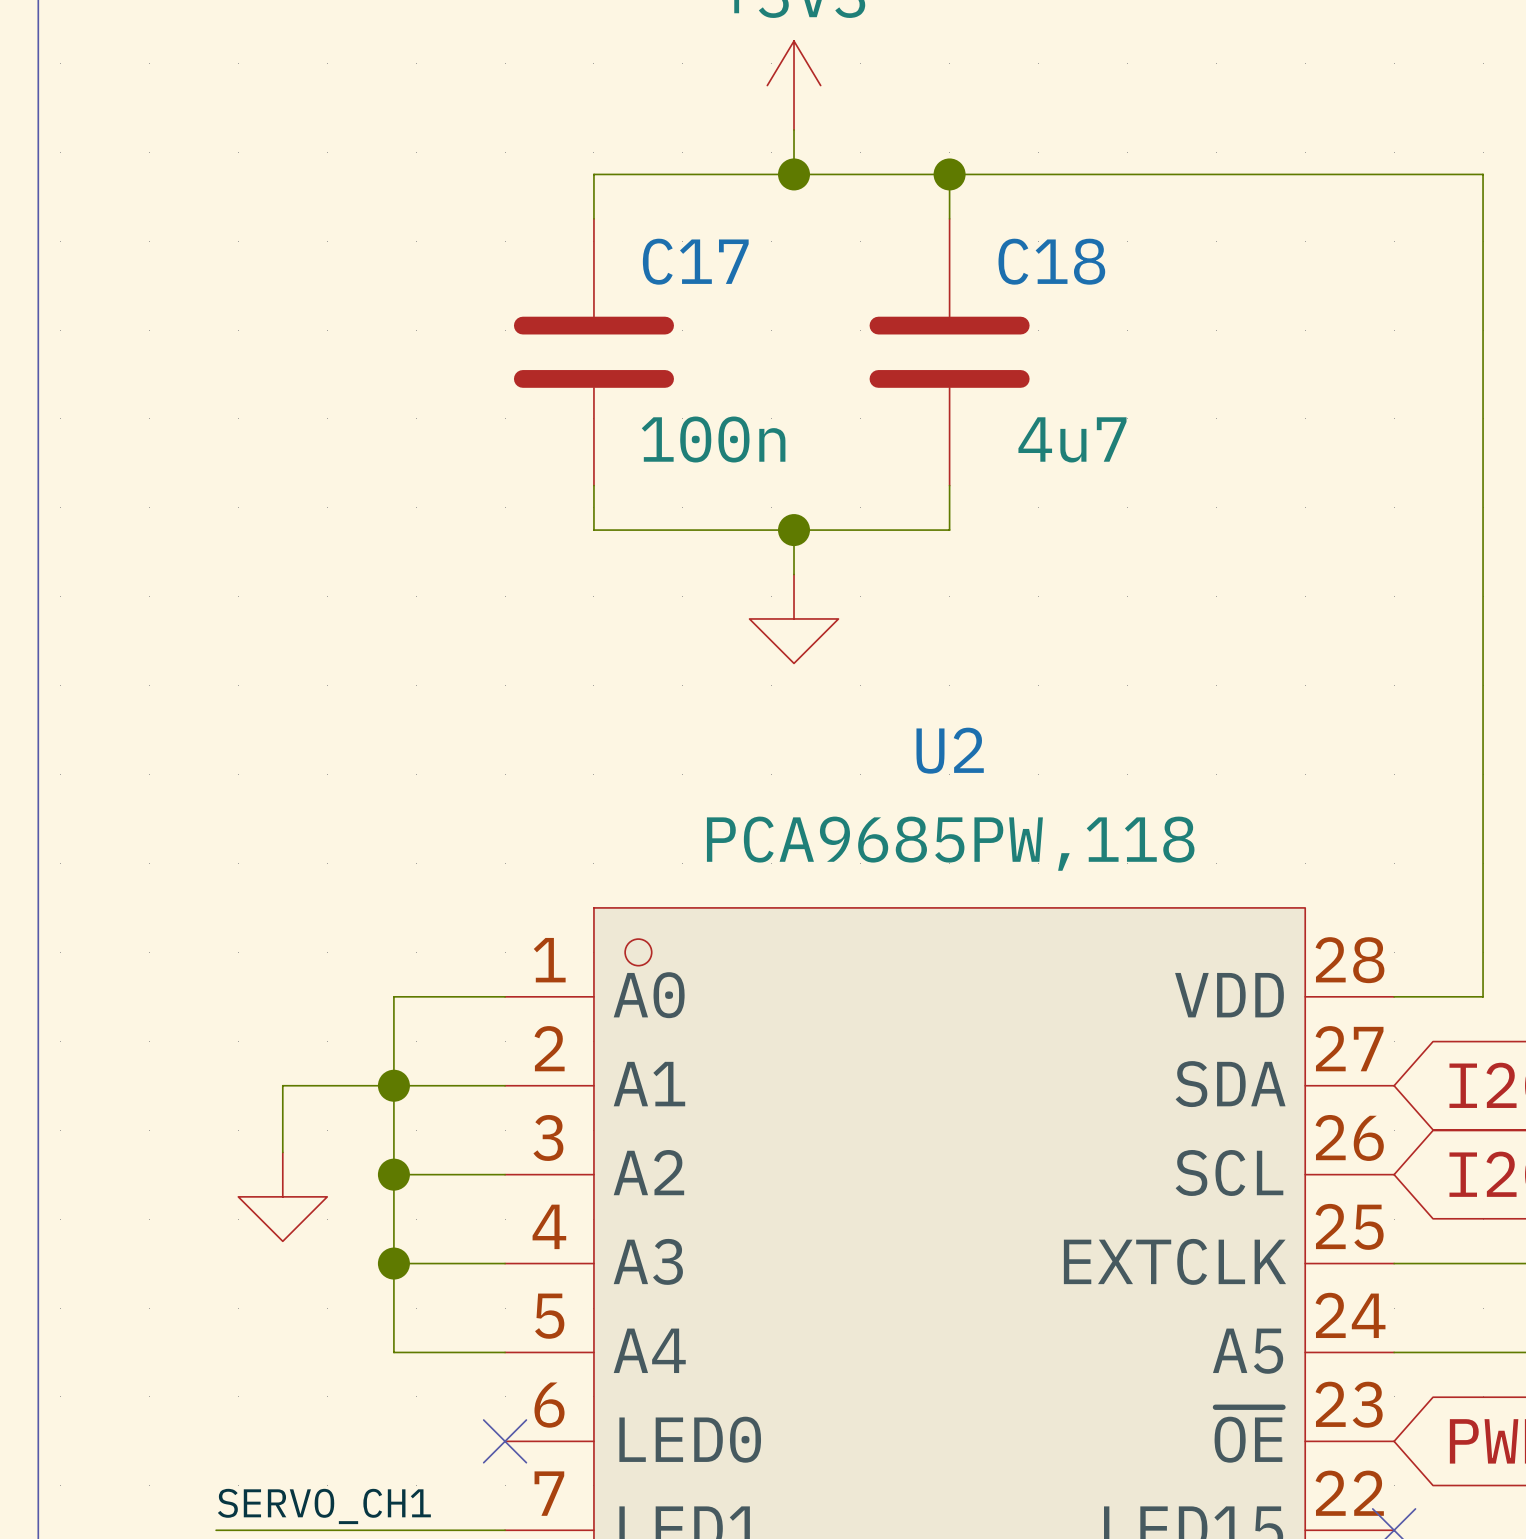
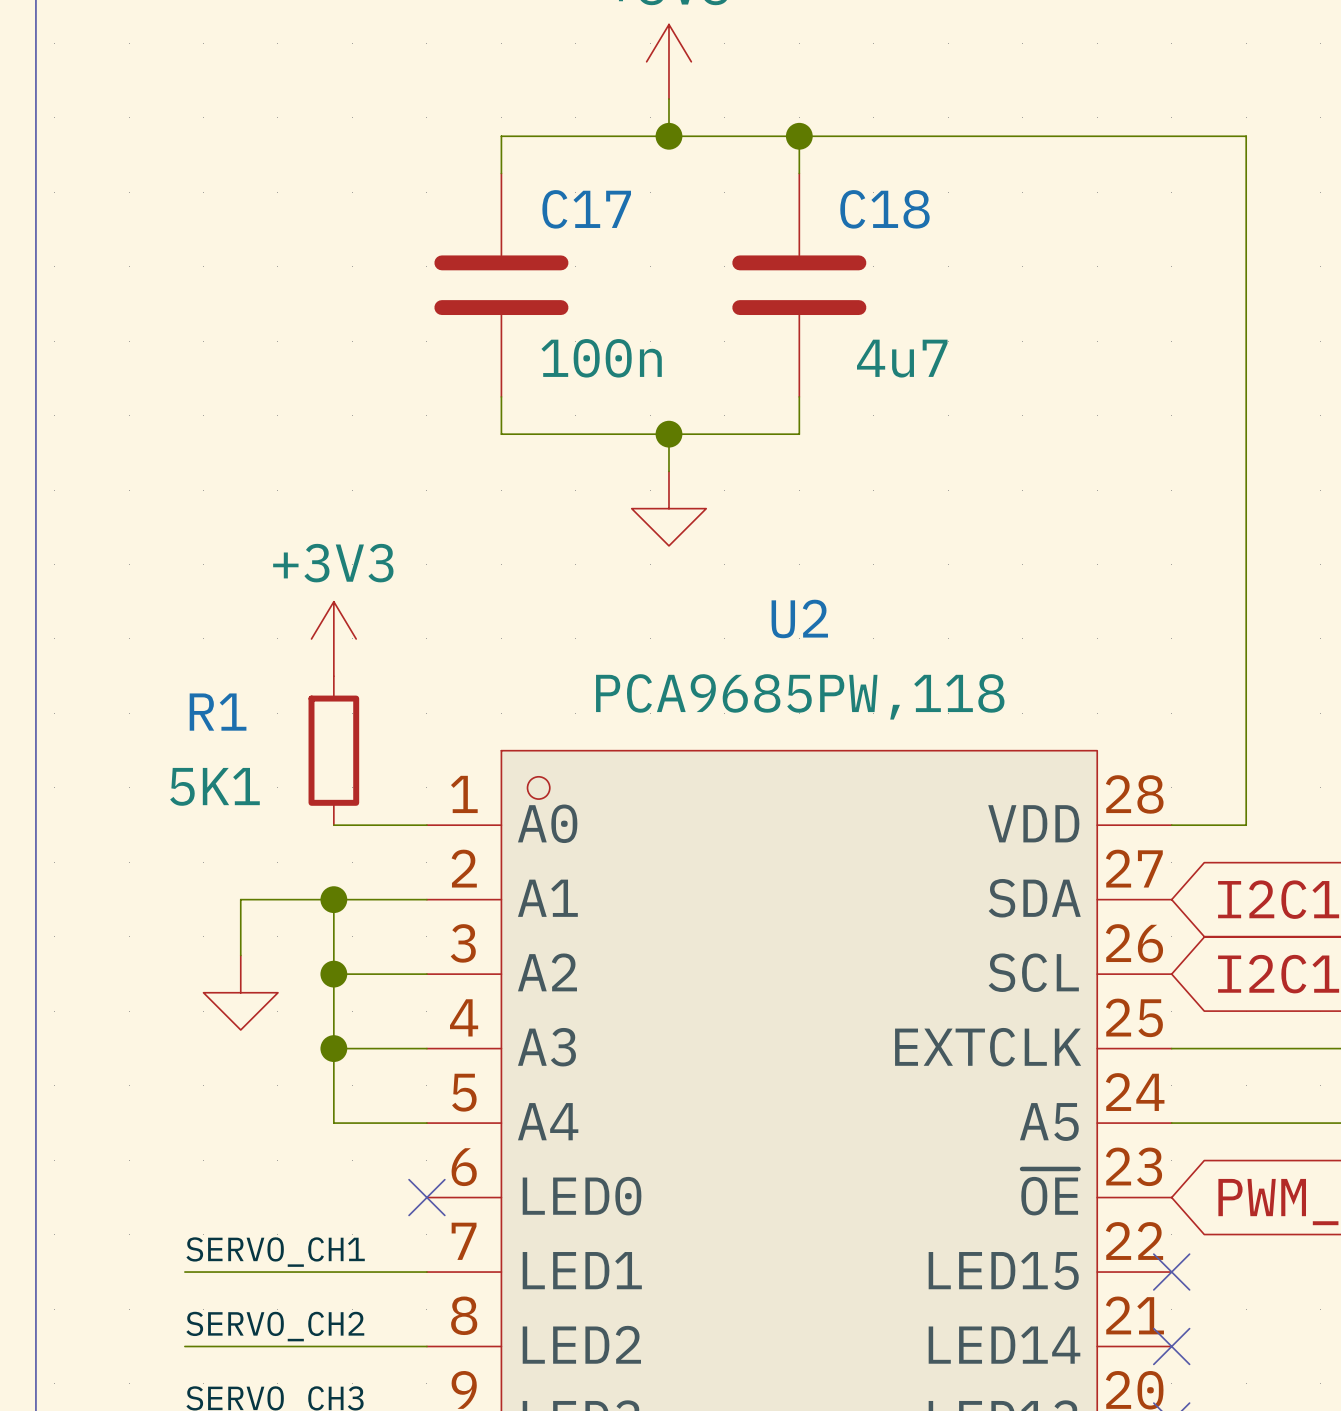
power symbol: none -> +3V3 (333, 638)
R1: none -> 5K1 (333, 750)
wire: (393, 996) (393, 1085) -> none

